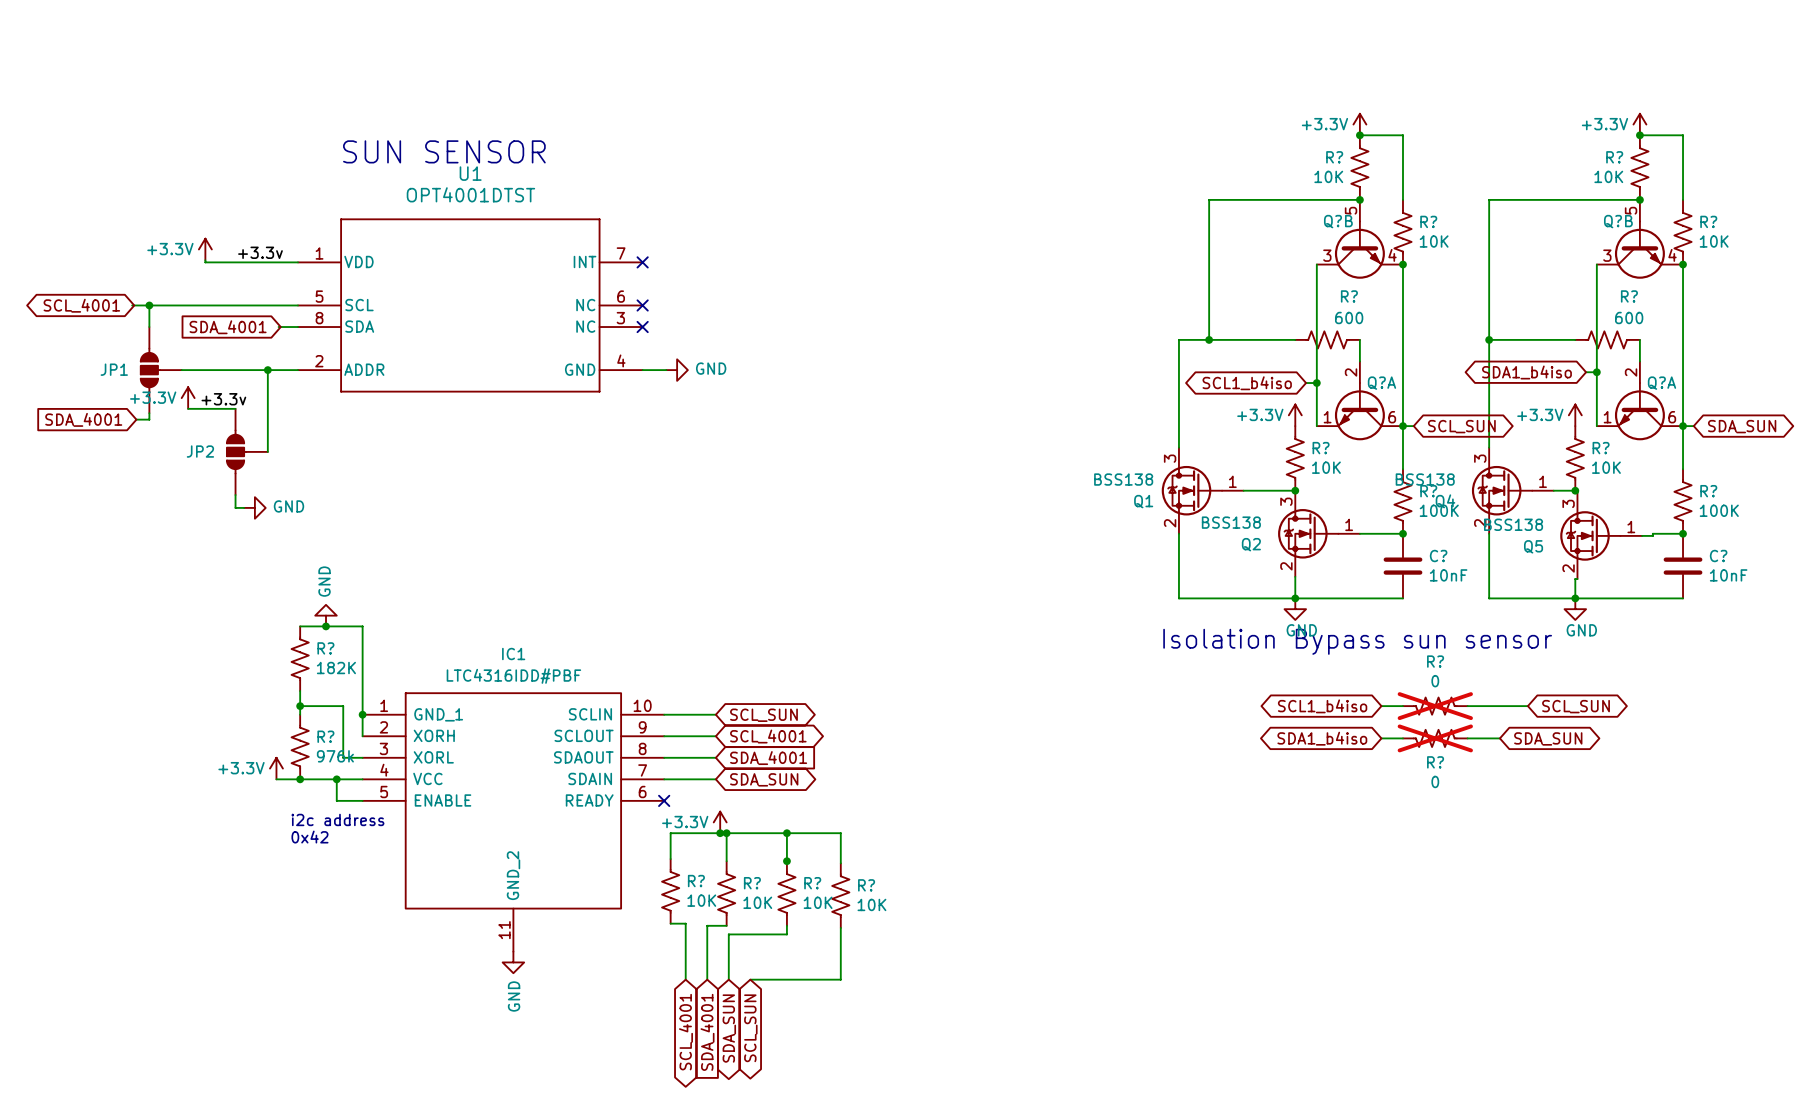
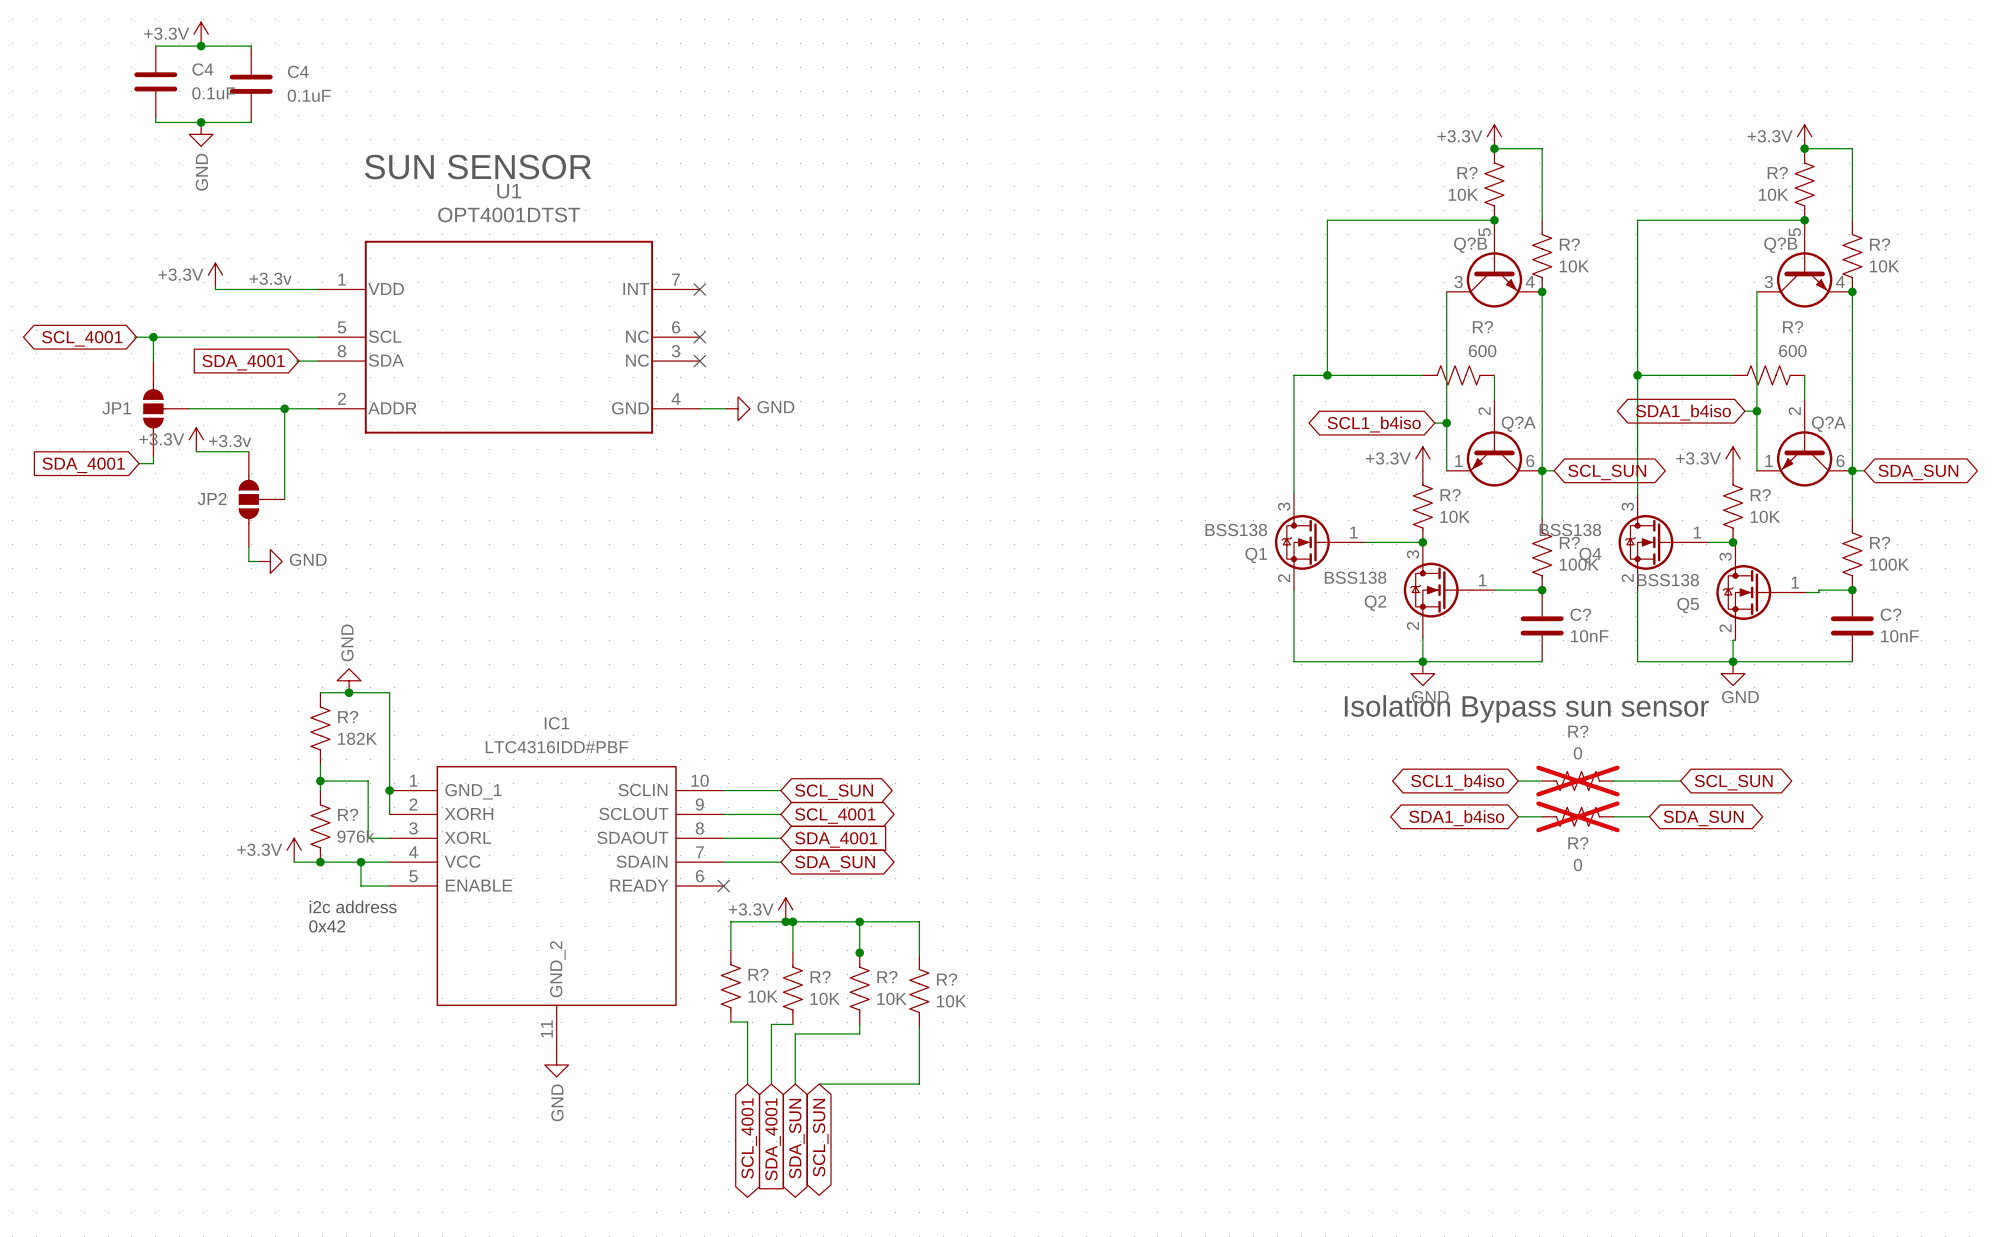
power symbol: none -> +3.3V (201, 34)
wire: none -> (155, 46) (251, 46) (251, 48)
junction: none -> (201, 46)
C4: none -> 0.1uF (155, 81)
C4: none -> 0.1uF (251, 84)
wire: none -> (155, 117) (155, 122) (251, 122) (251, 120)
junction: none -> (201, 122)
power symbol: none -> GND (201, 134)

